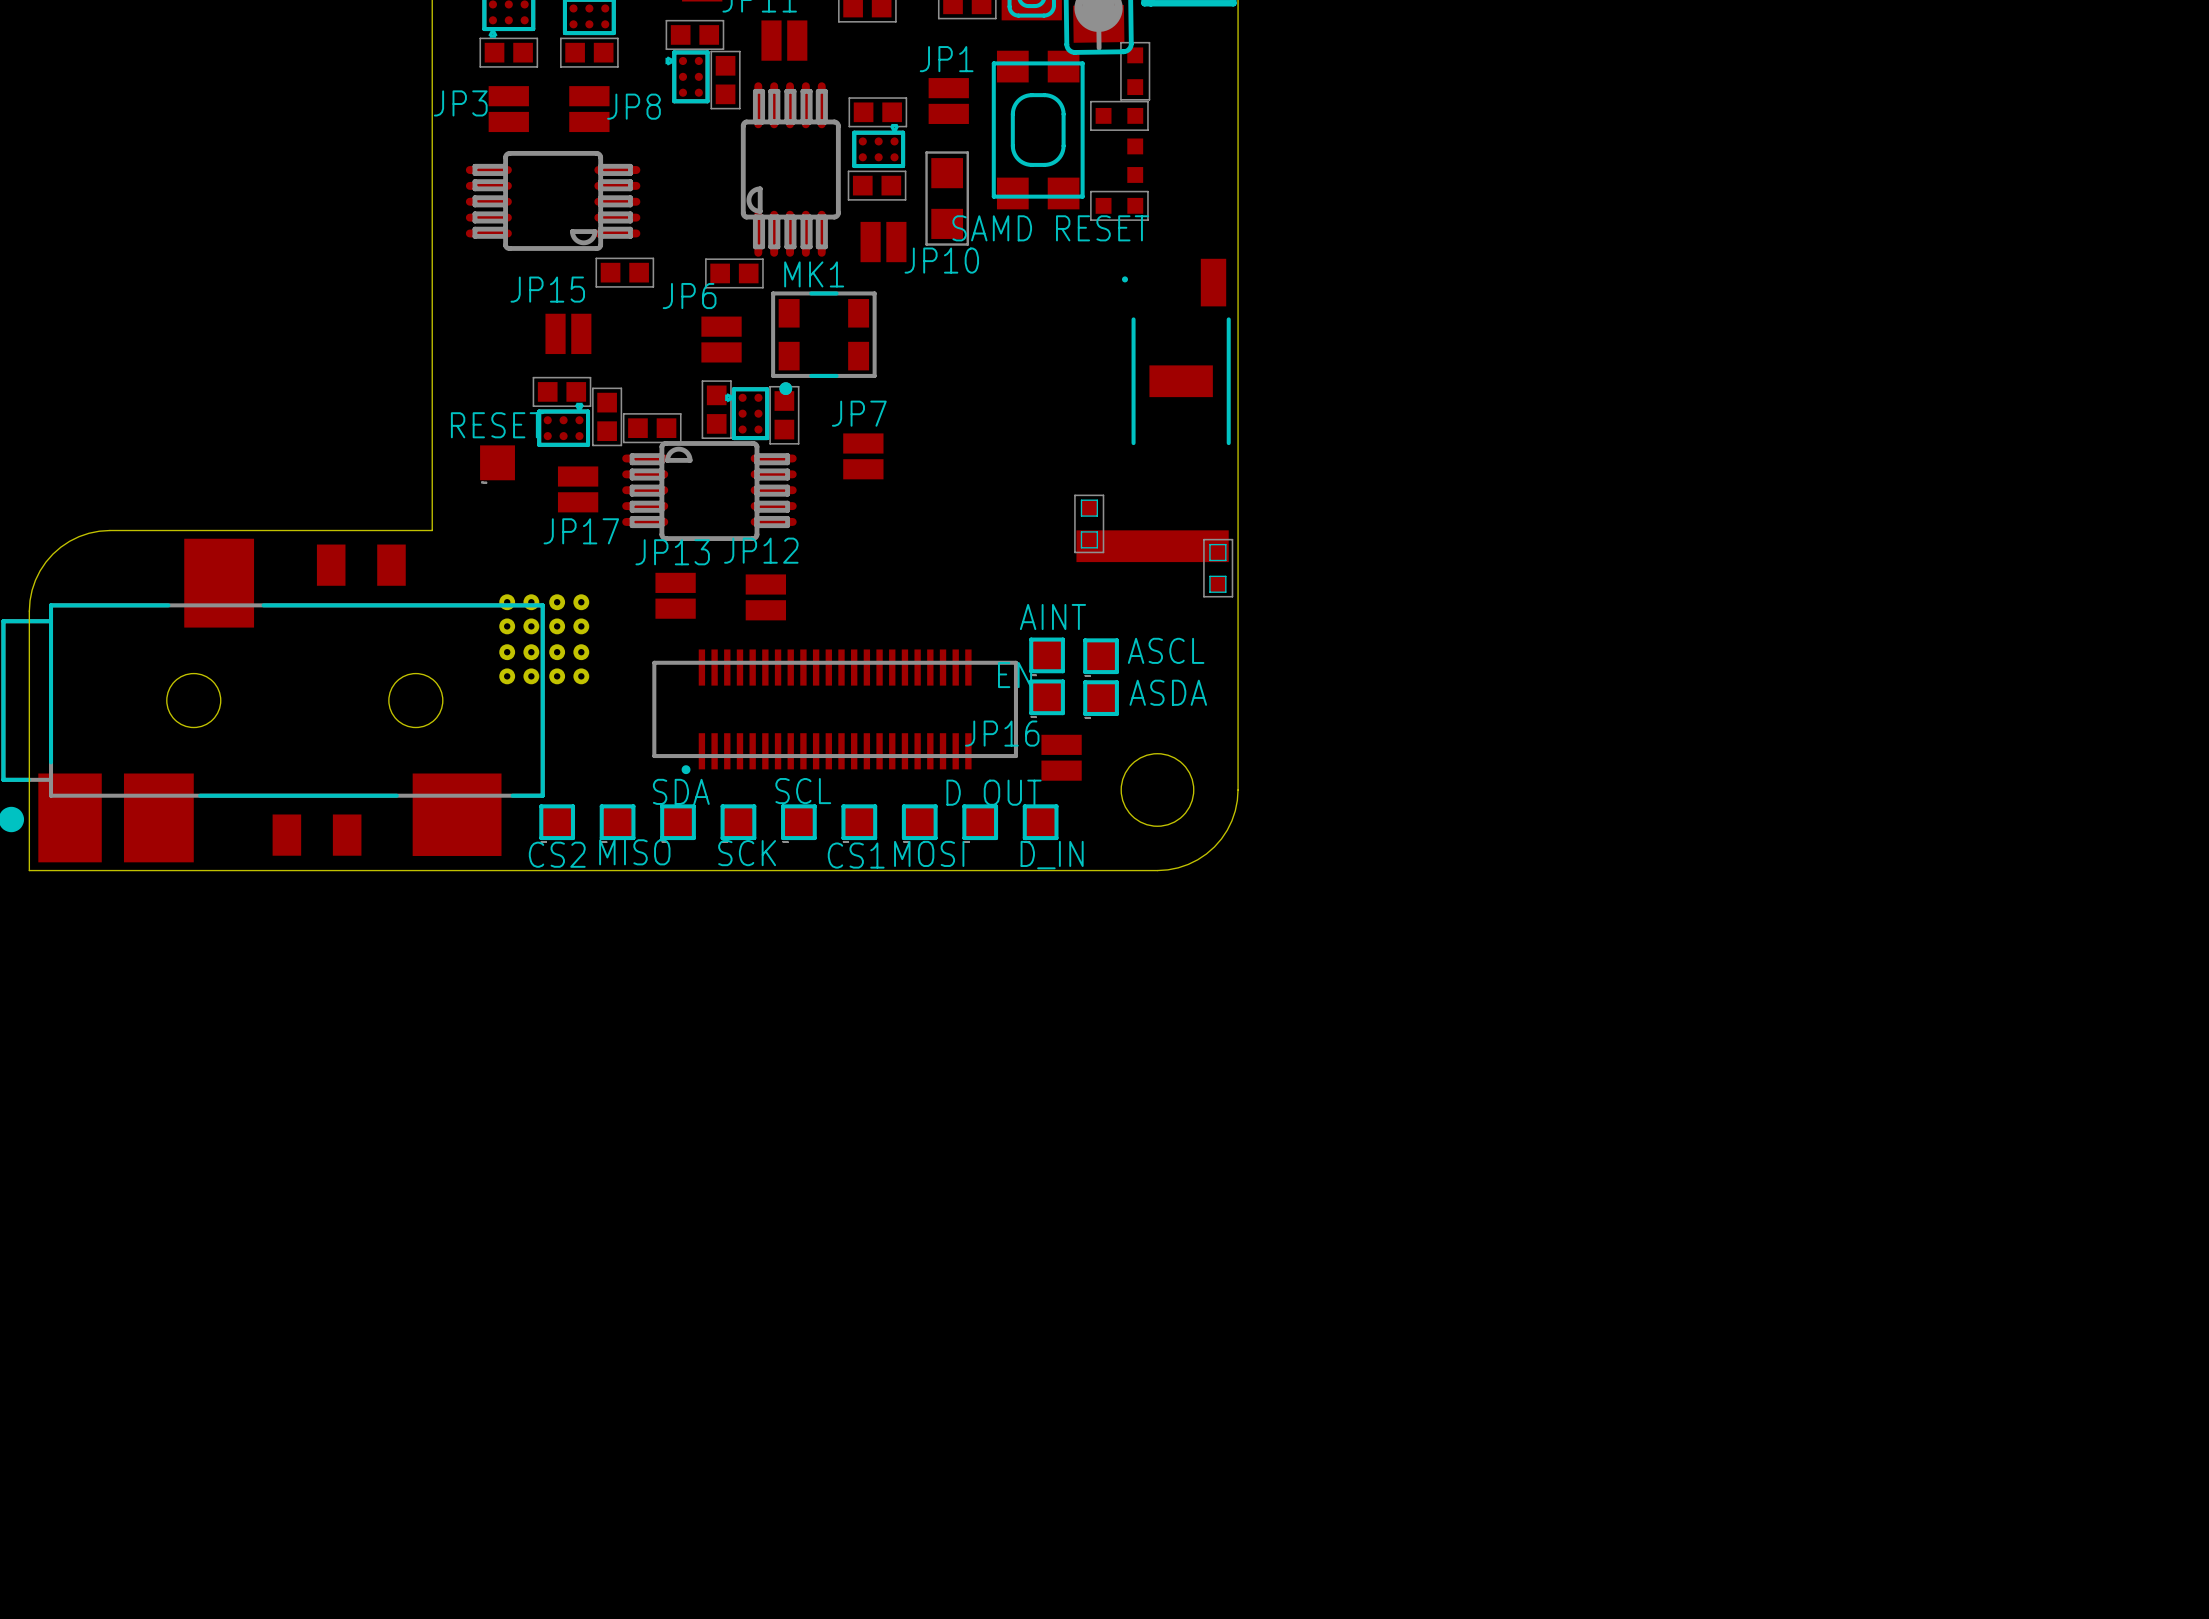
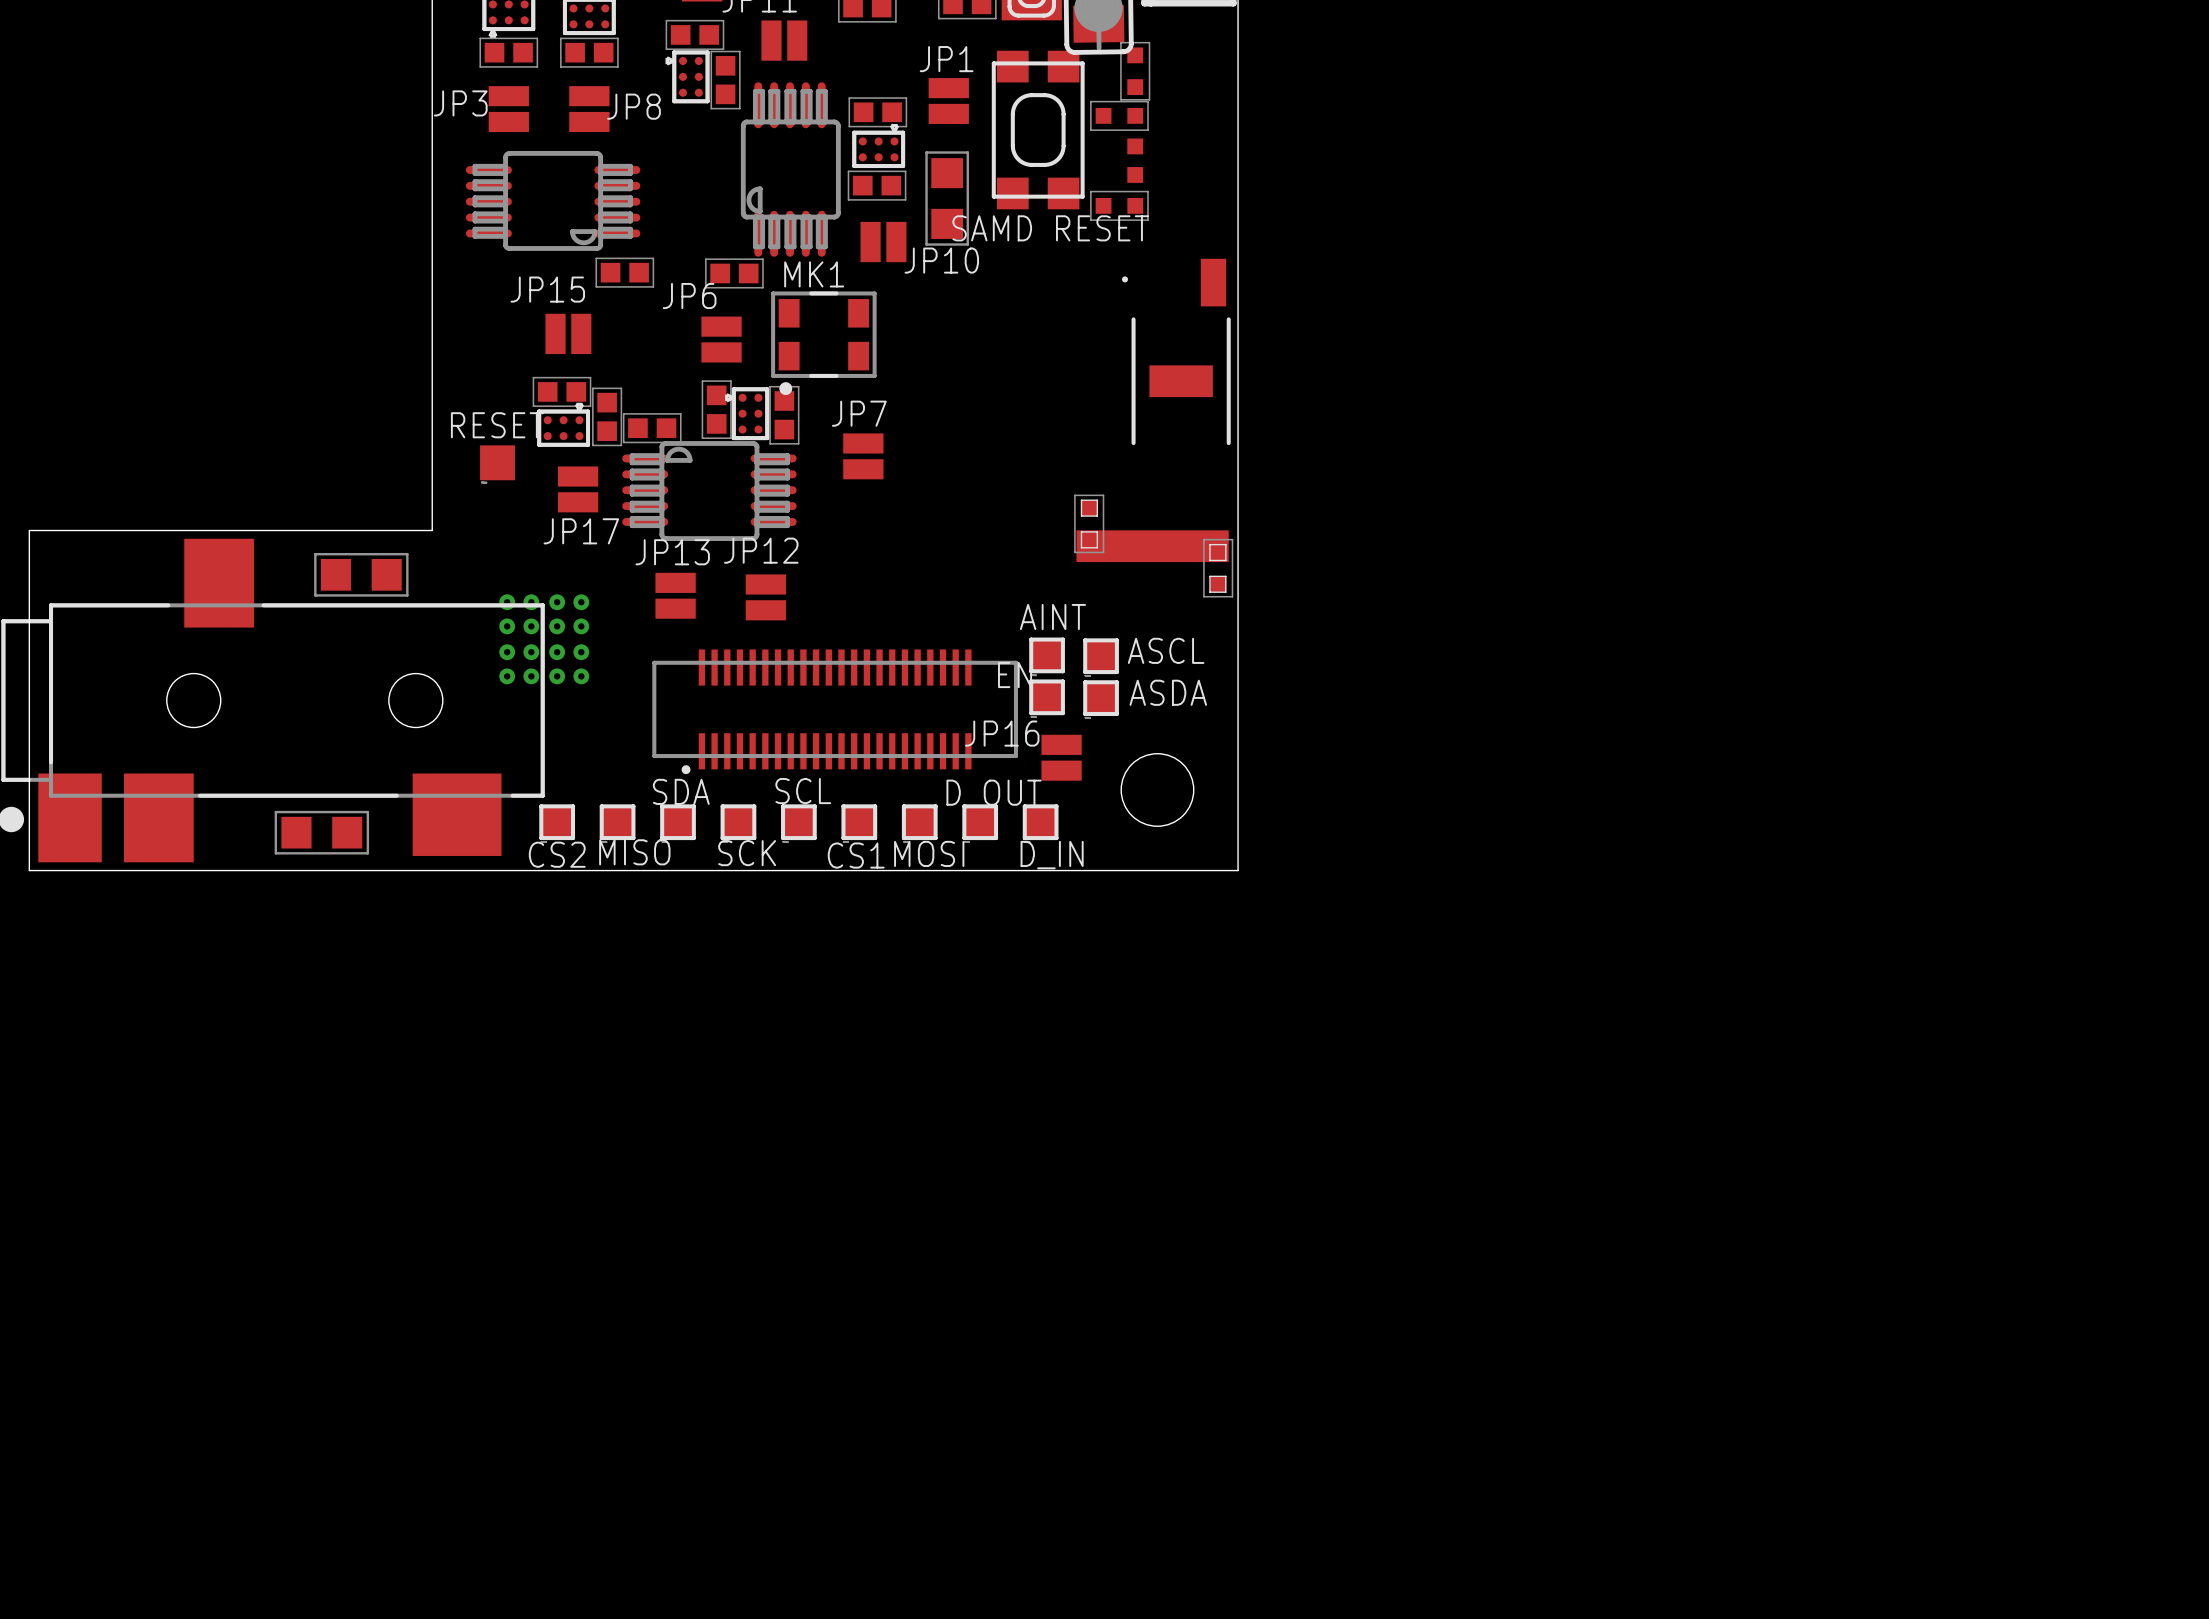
board edge: (109, 530) (79, 536) (52, 554) (35, 580) (29, 611) -> (109, 530) (29, 530) (29, 611)
part footprint: [316, 544, 406, 586] -> [314, 553, 409, 597]
board edge: (1238, 789) (1231, 820) (1214, 846) (1188, 864) (1157, 870) -> (1238, 789) (1238, 870) (1157, 870)
part footprint: [272, 814, 362, 856] -> [274, 810, 370, 855]

